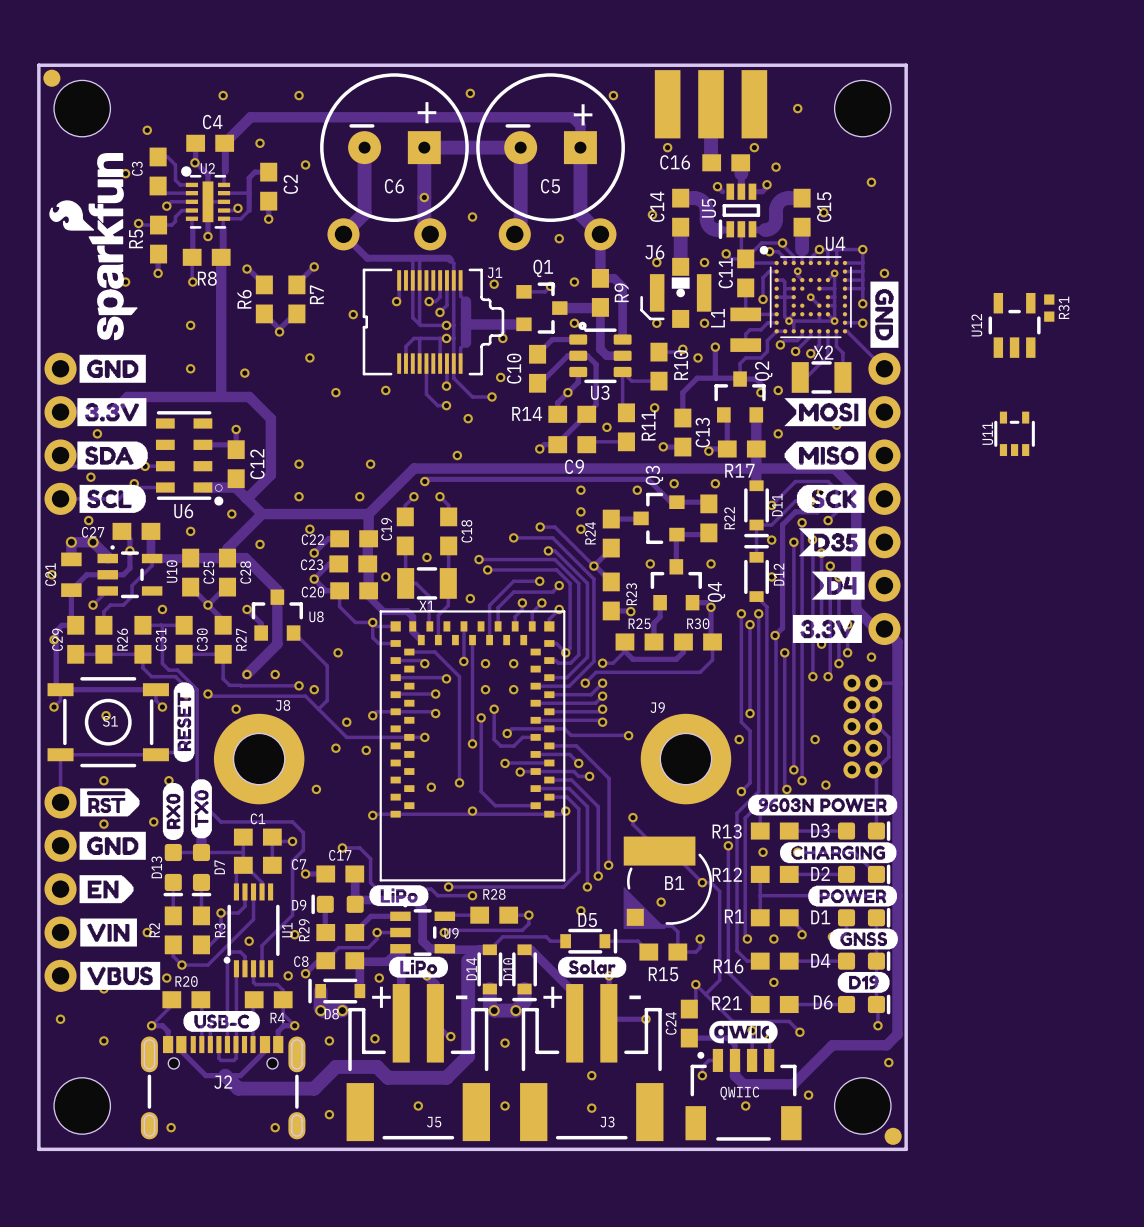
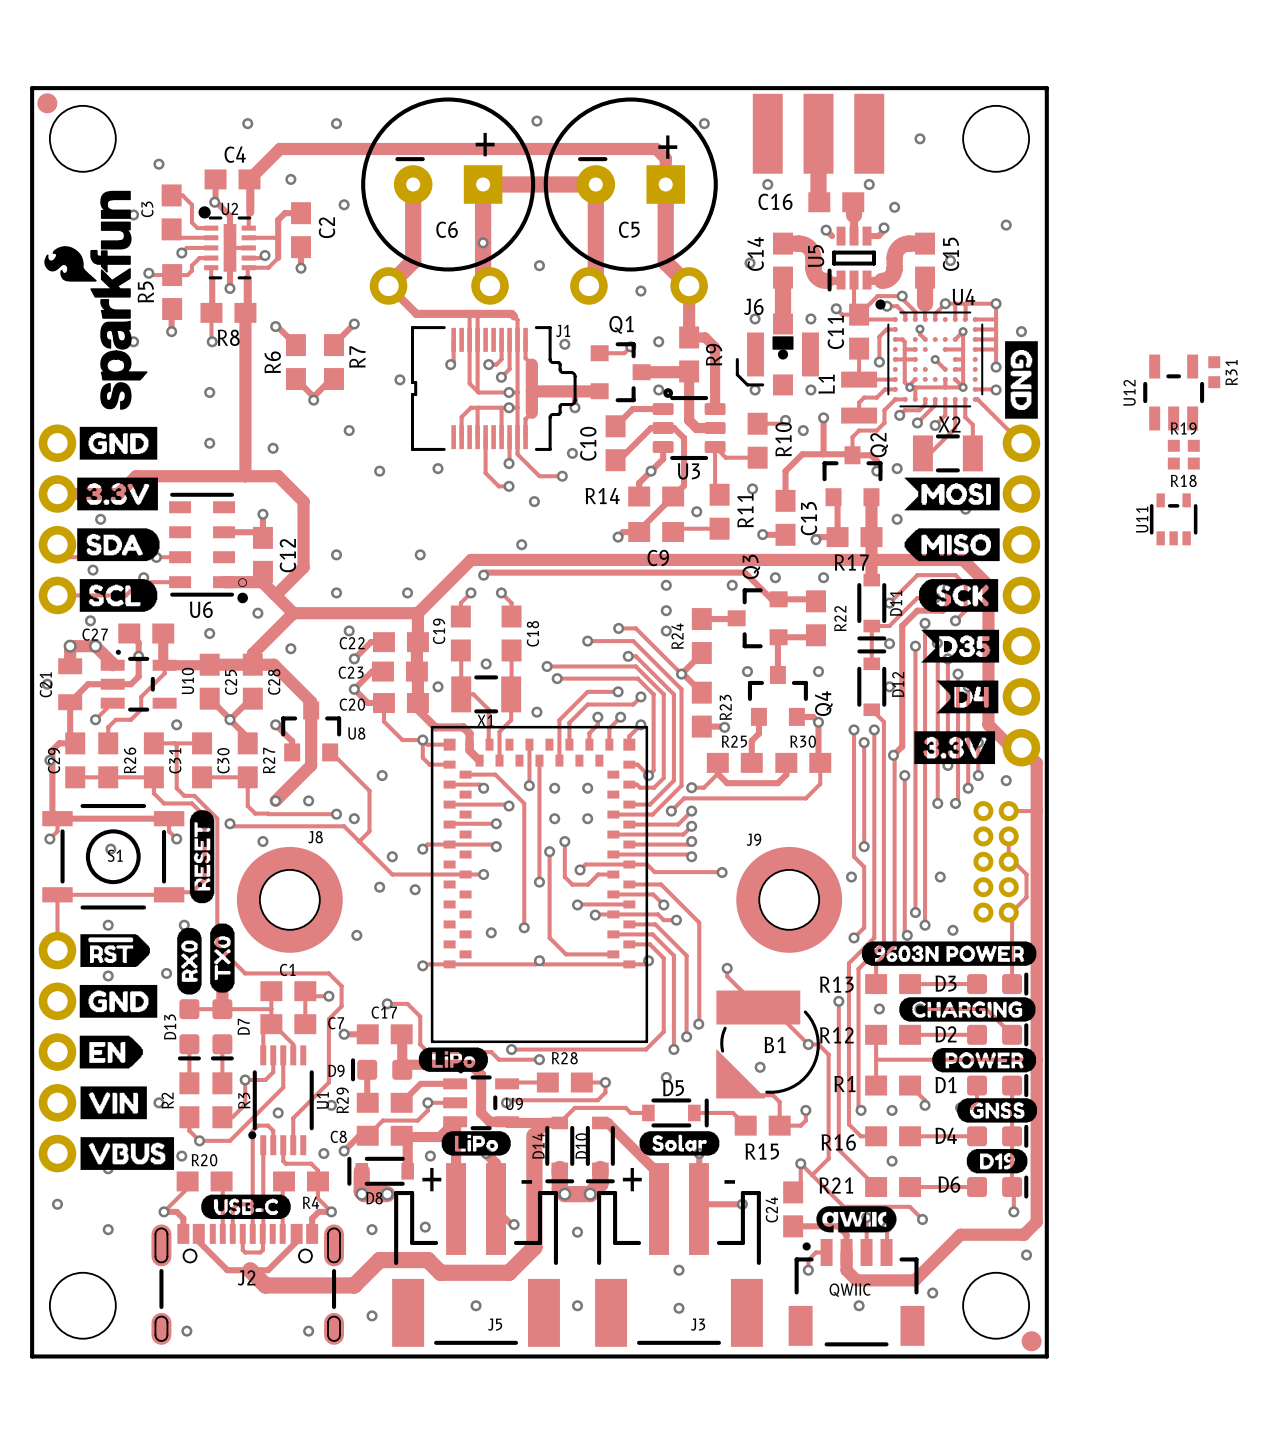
R19: none -> (1183, 445)
R18: none -> (1183, 463)

